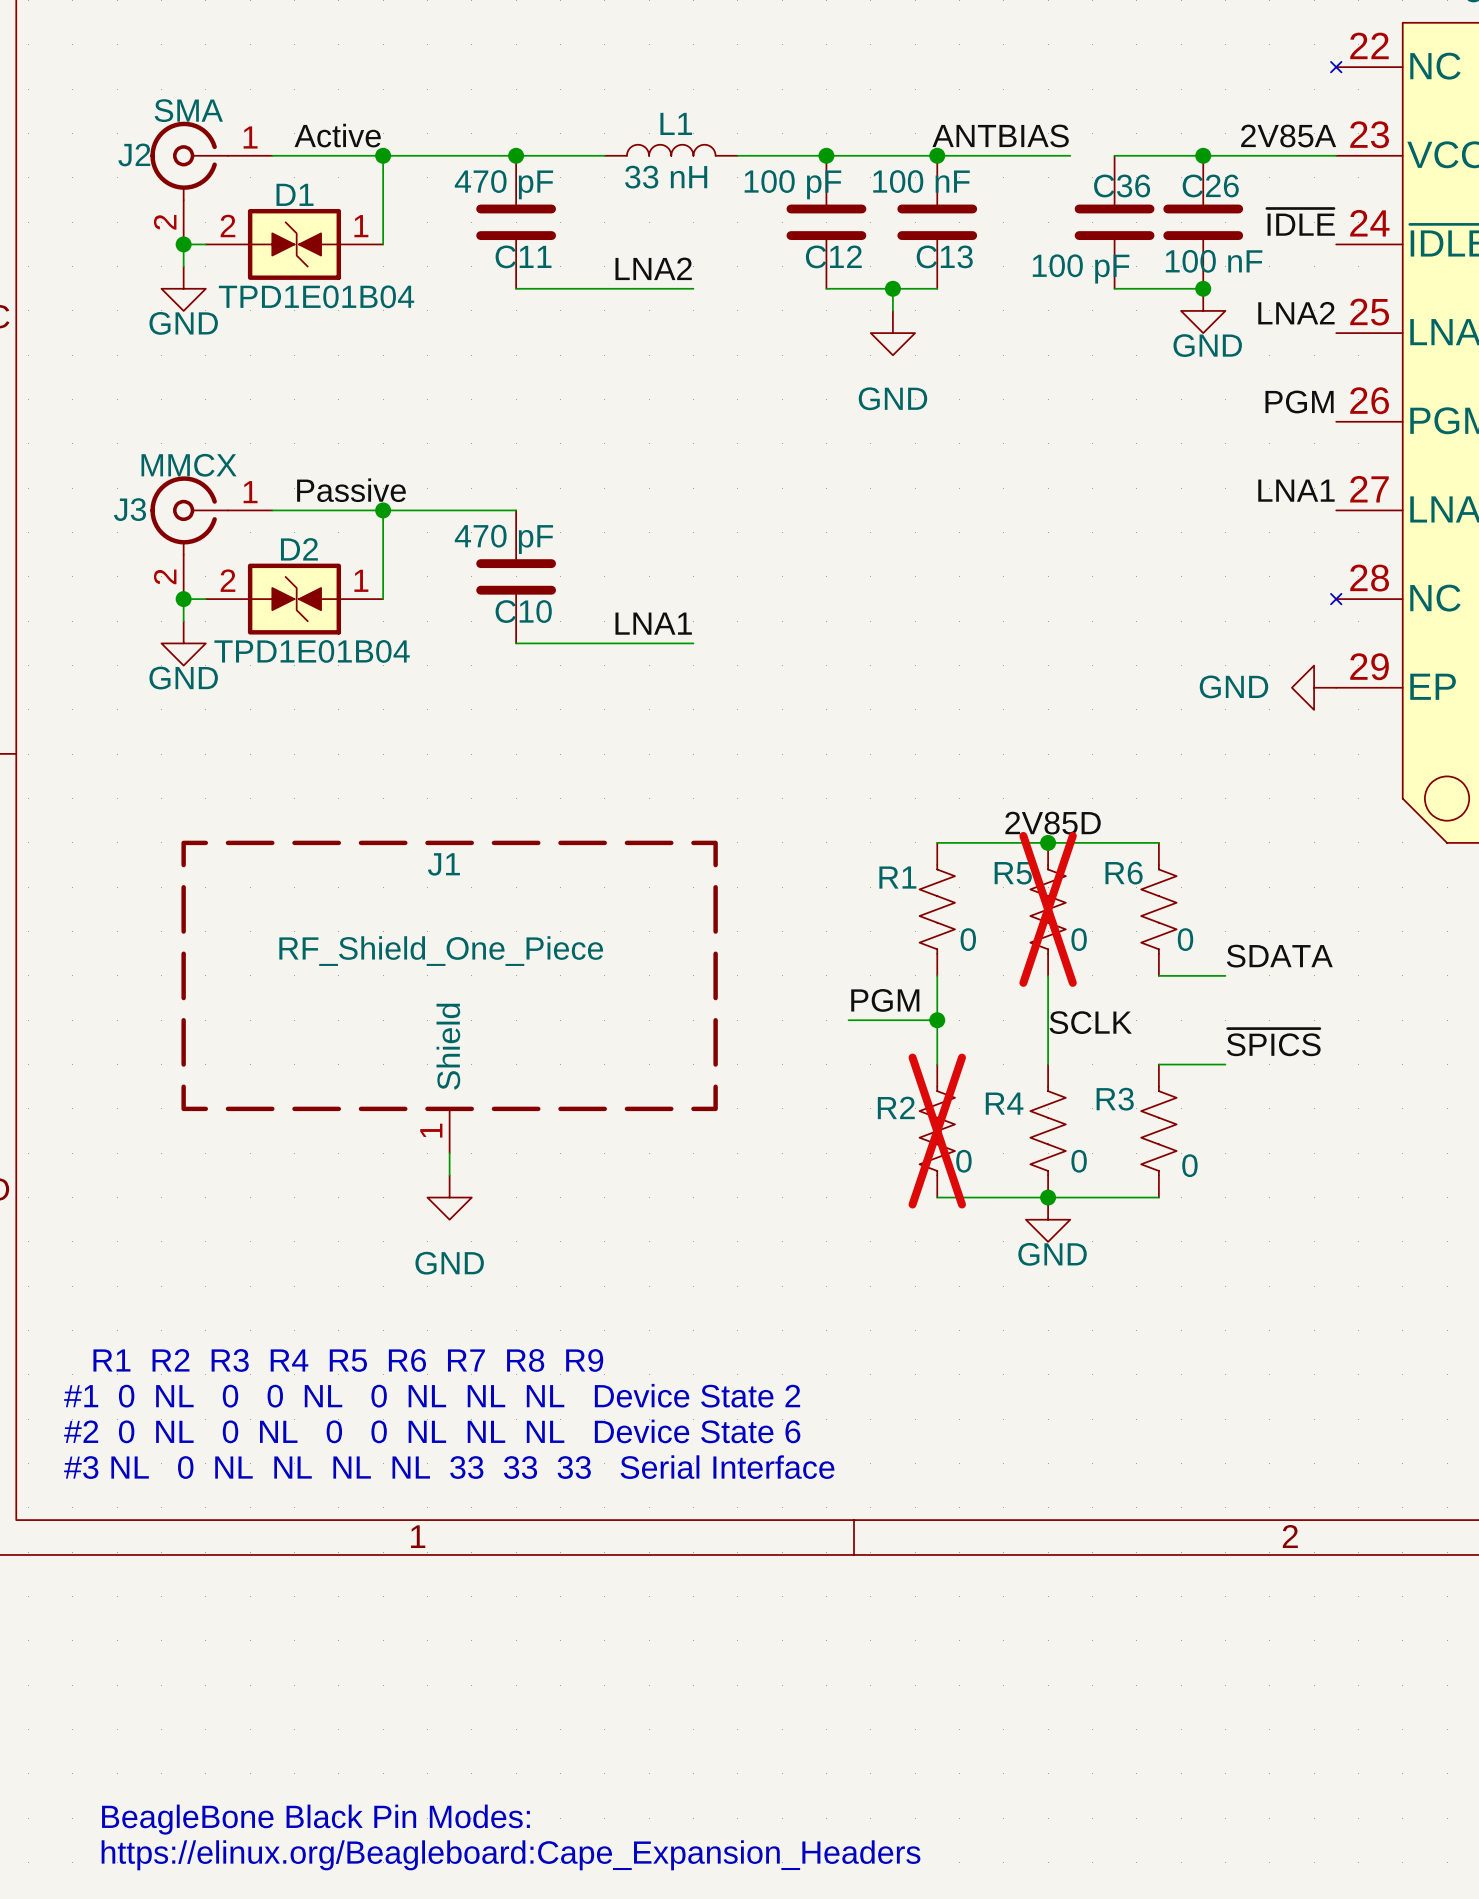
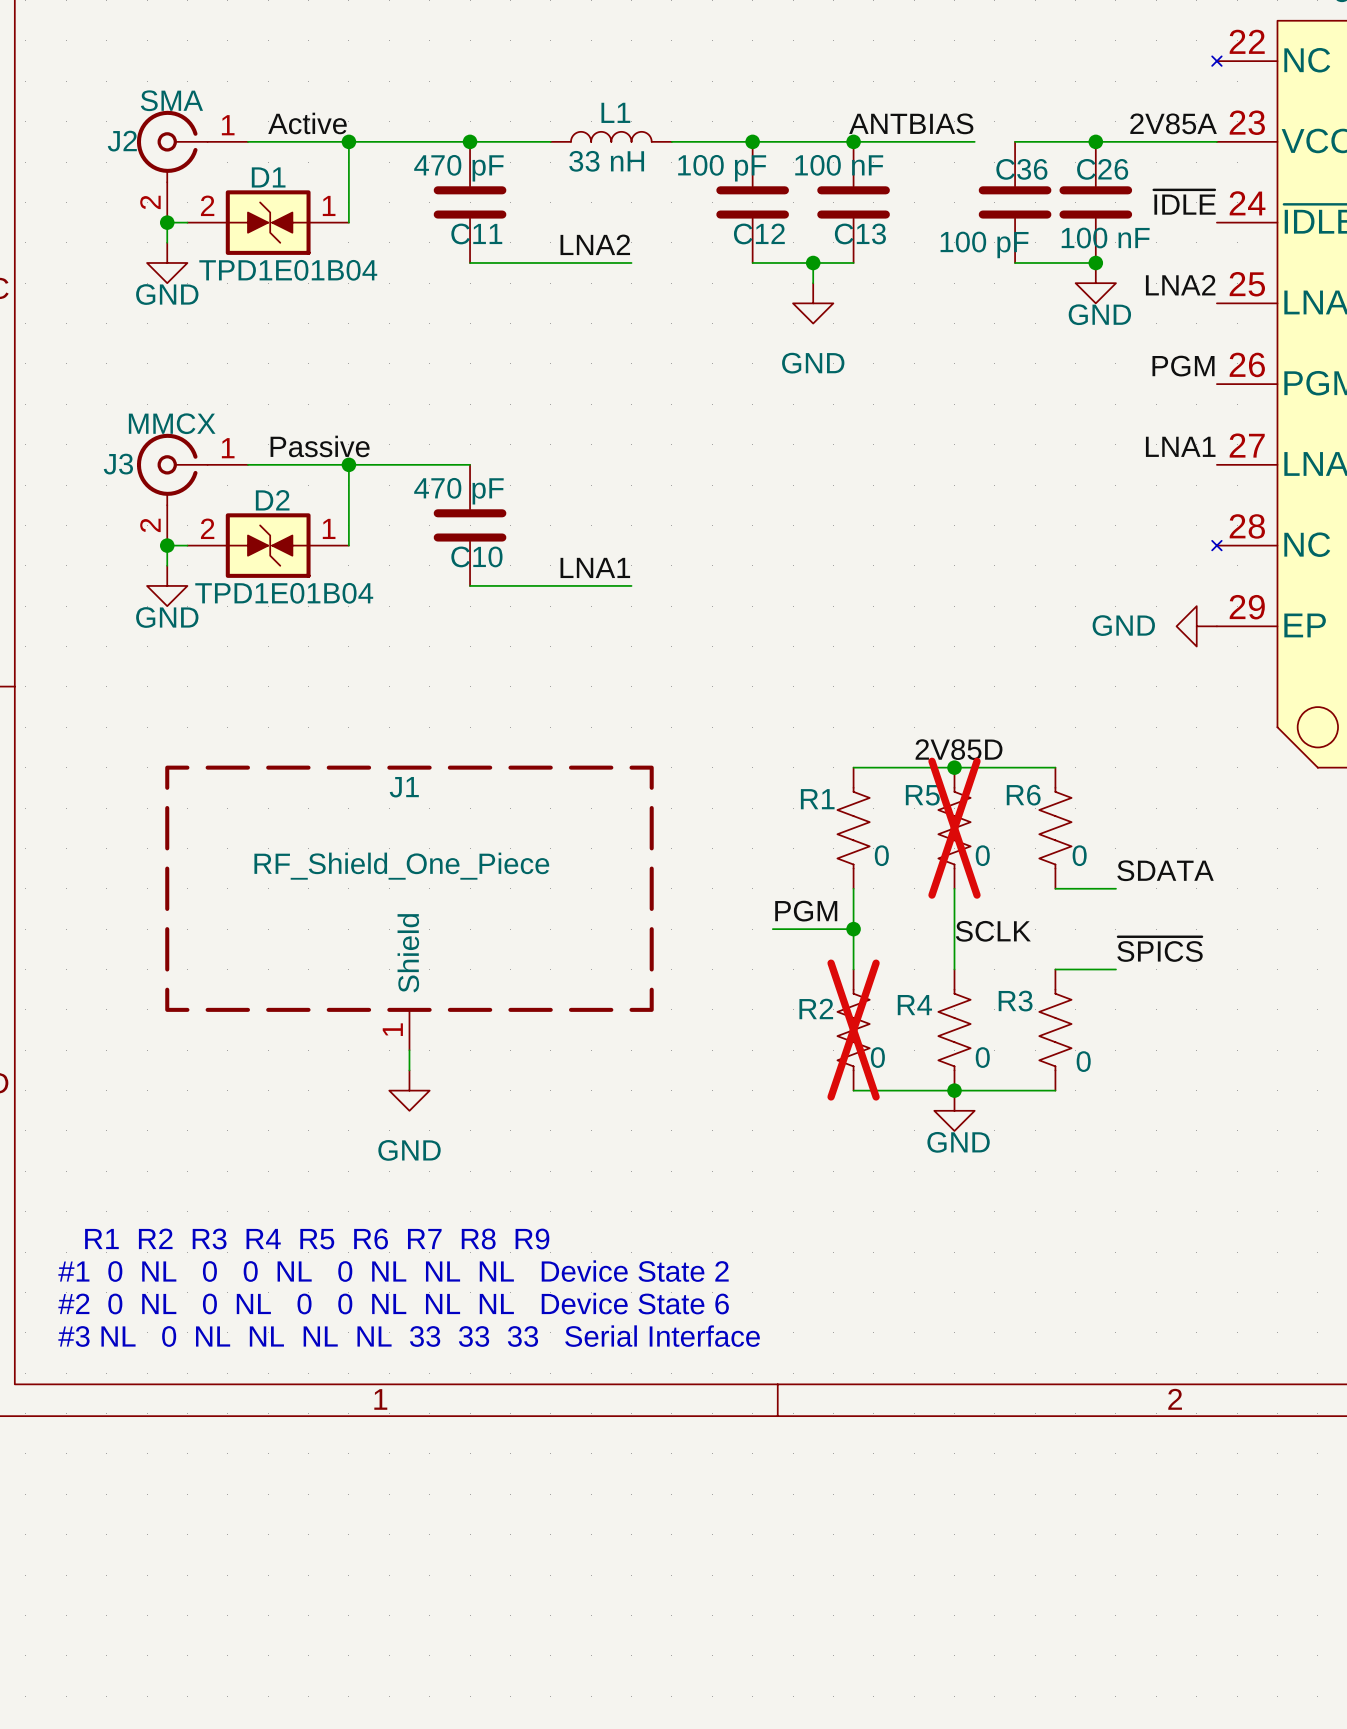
text: BeagleBone Black Pin Modes: (315, 1819) -> none
text: https://elinux.org/Beagleboard:Cape_Expansion_Headers (511, 1855) -> none

